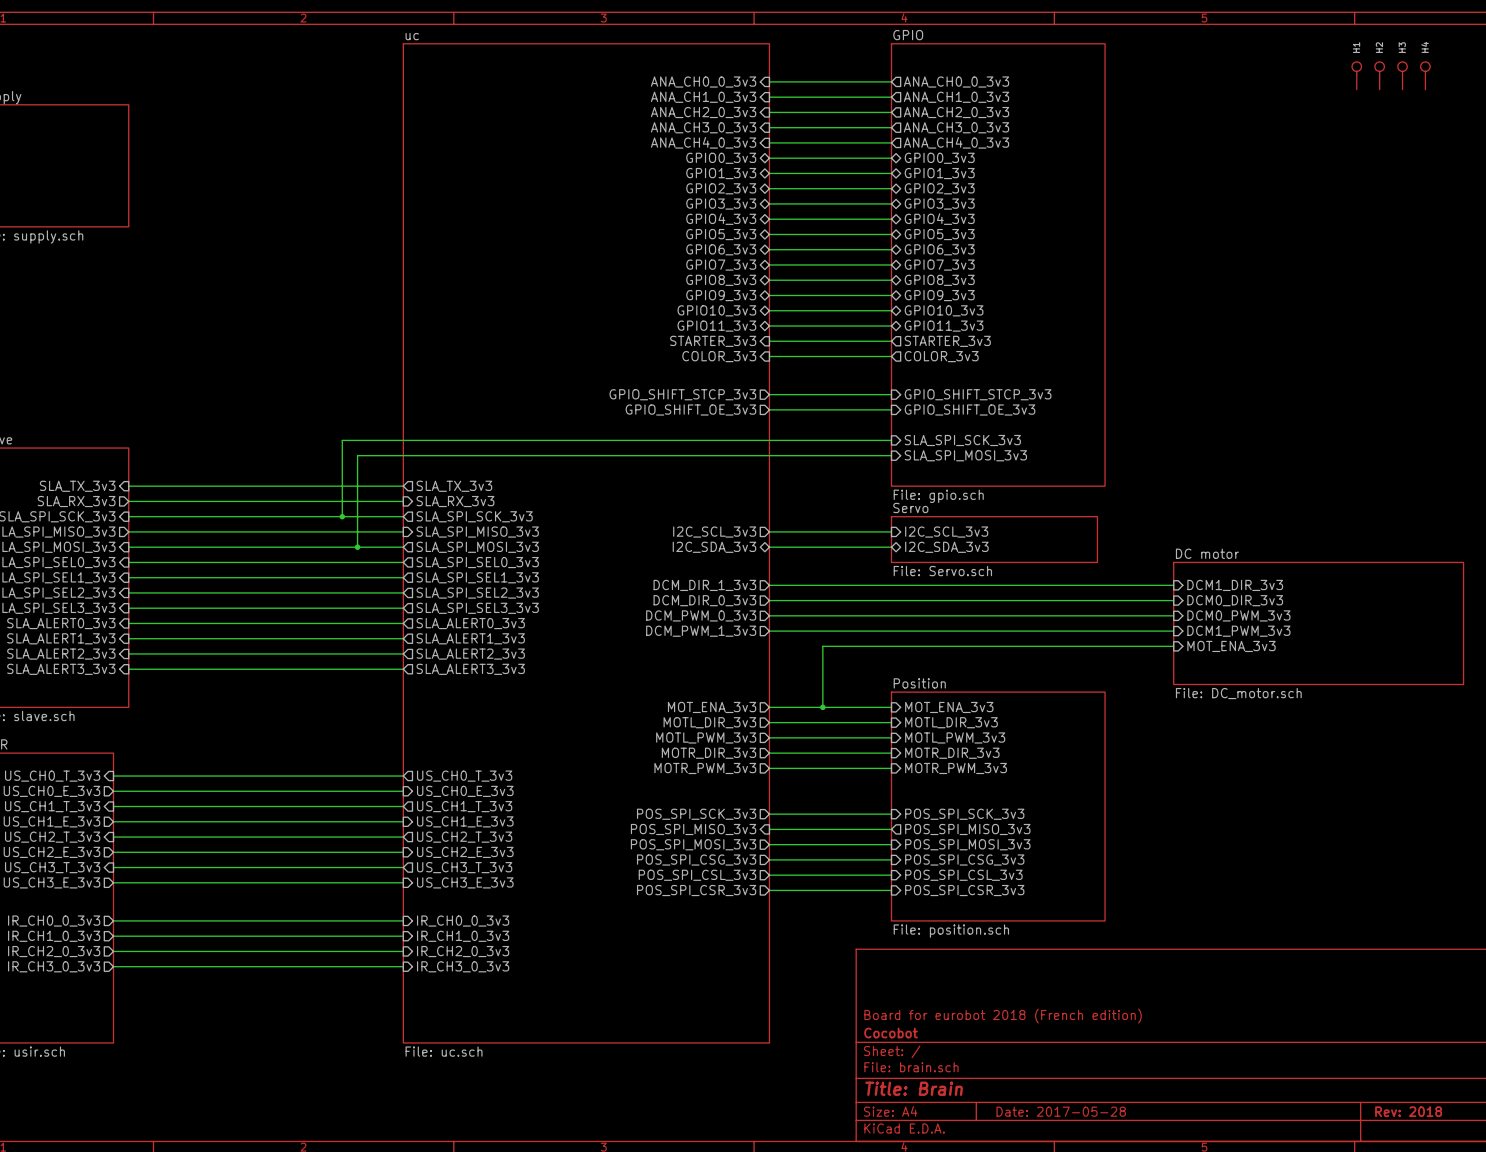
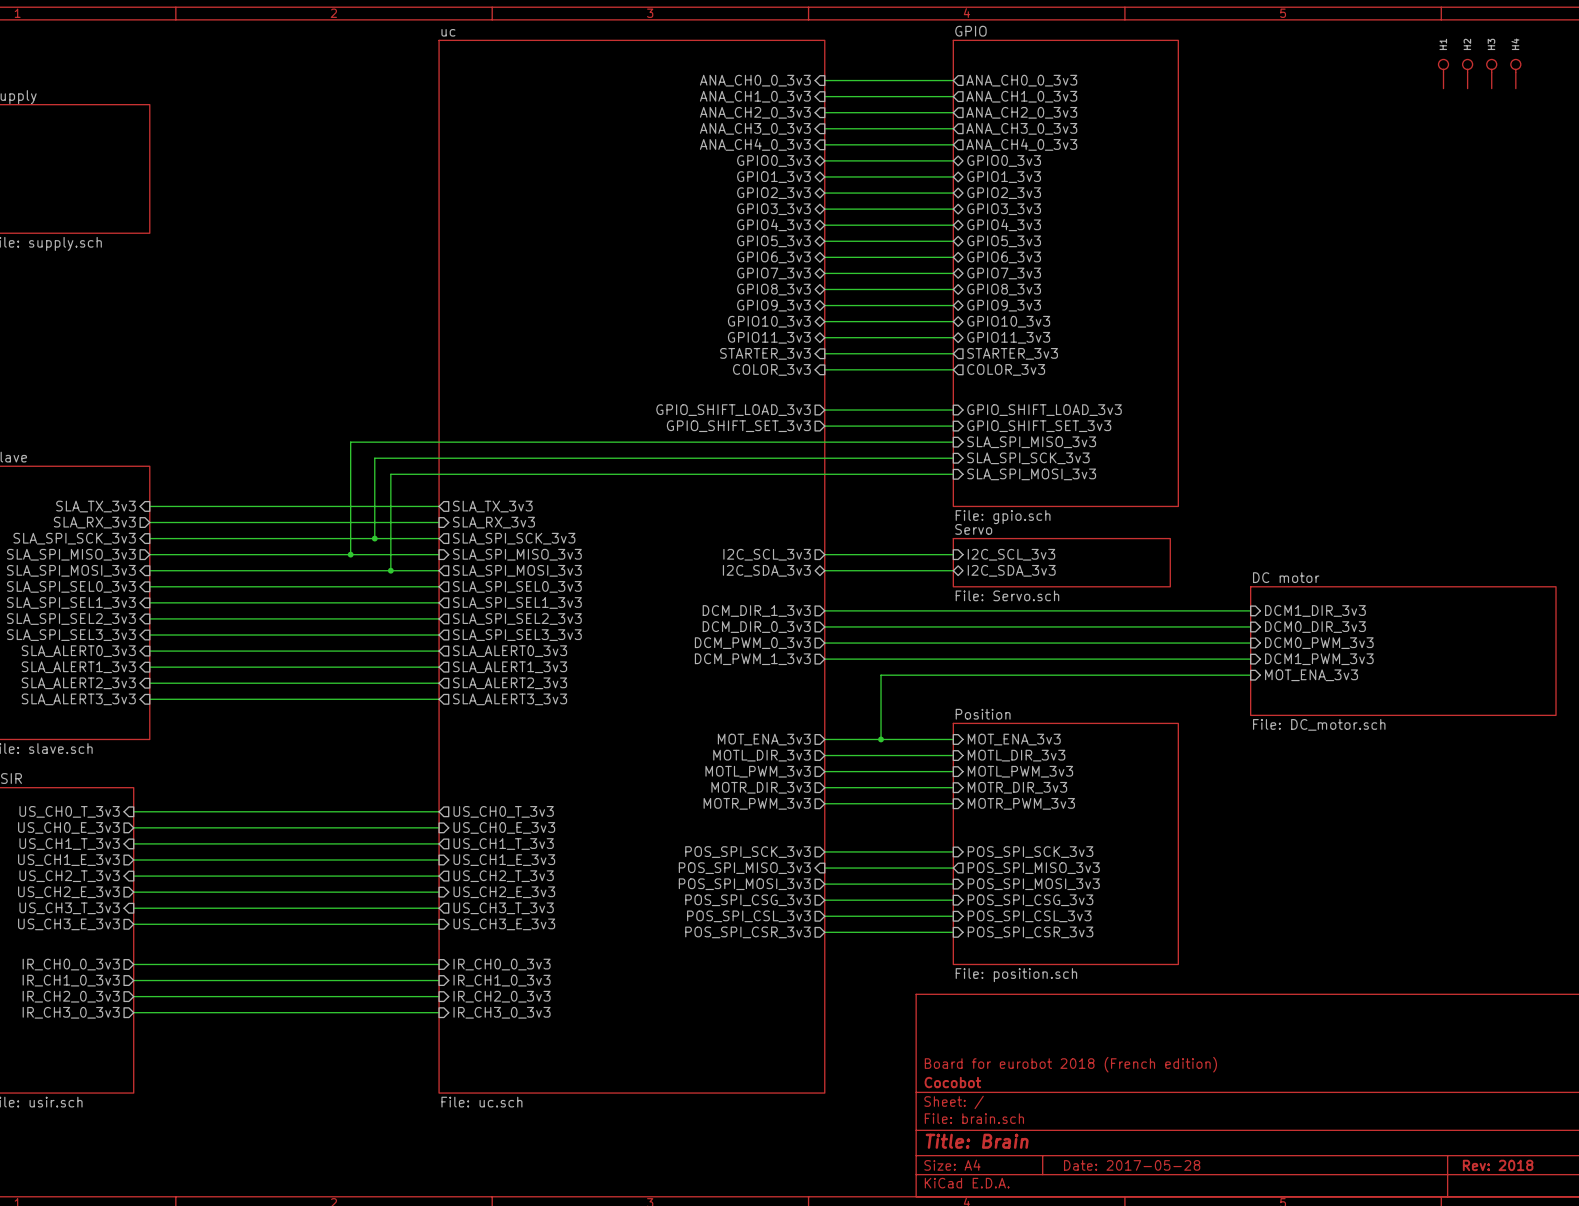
sheet pin: GPIO_SHIFT_STCP_3v3 (682, 394) -> GPIO_SHIFT_LOAD_3v3 (733, 410)
sheet pin: GPIO_SHIFT_STCP_3v3 (978, 394) -> GPIO_SHIFT_LOAD_3v3 (1044, 410)
sheet pin: GPIO_SHIFT_OE_3v3 (690, 409) -> GPIO_SHIFT_SET_3v3 (738, 426)
sheet pin: GPIO_SHIFT_OE_3v3 (970, 409) -> GPIO_SHIFT_SET_3v3 (1039, 426)
wire: none -> (953, 442) (350, 442) (350, 554)
sheet pin: none -> SLA_SPI_MISO_3v3 (1031, 442)
junction: none -> (350, 554)

